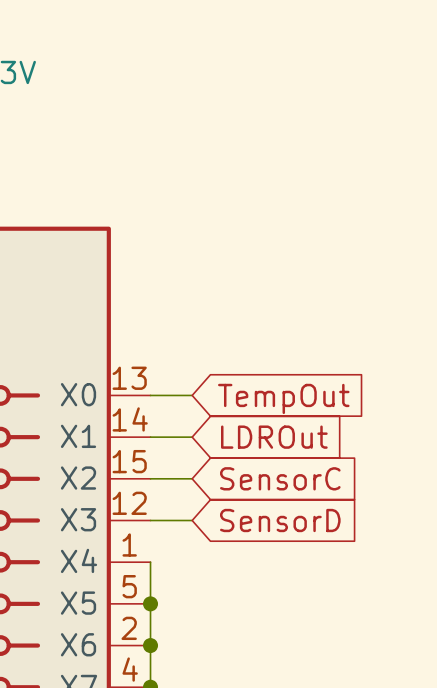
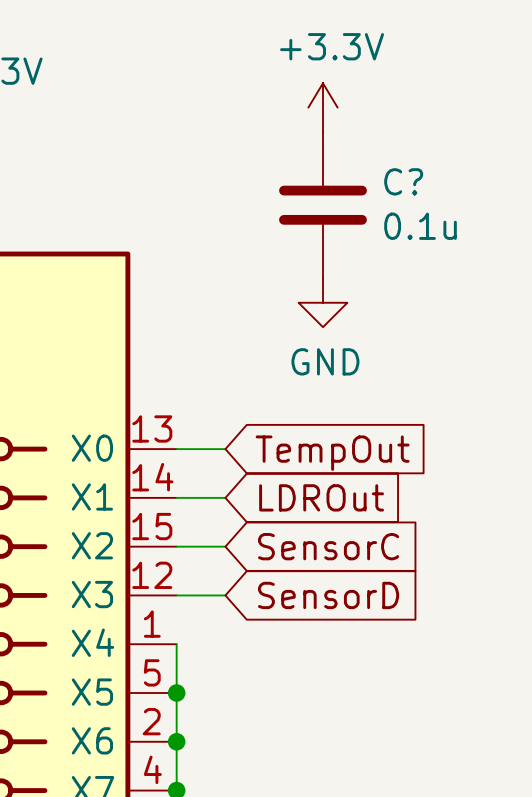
power symbol: none -> +3.3V (322, 107)
C?: none -> 0.1u (322, 205)
power symbol: none -> GND (322, 302)

